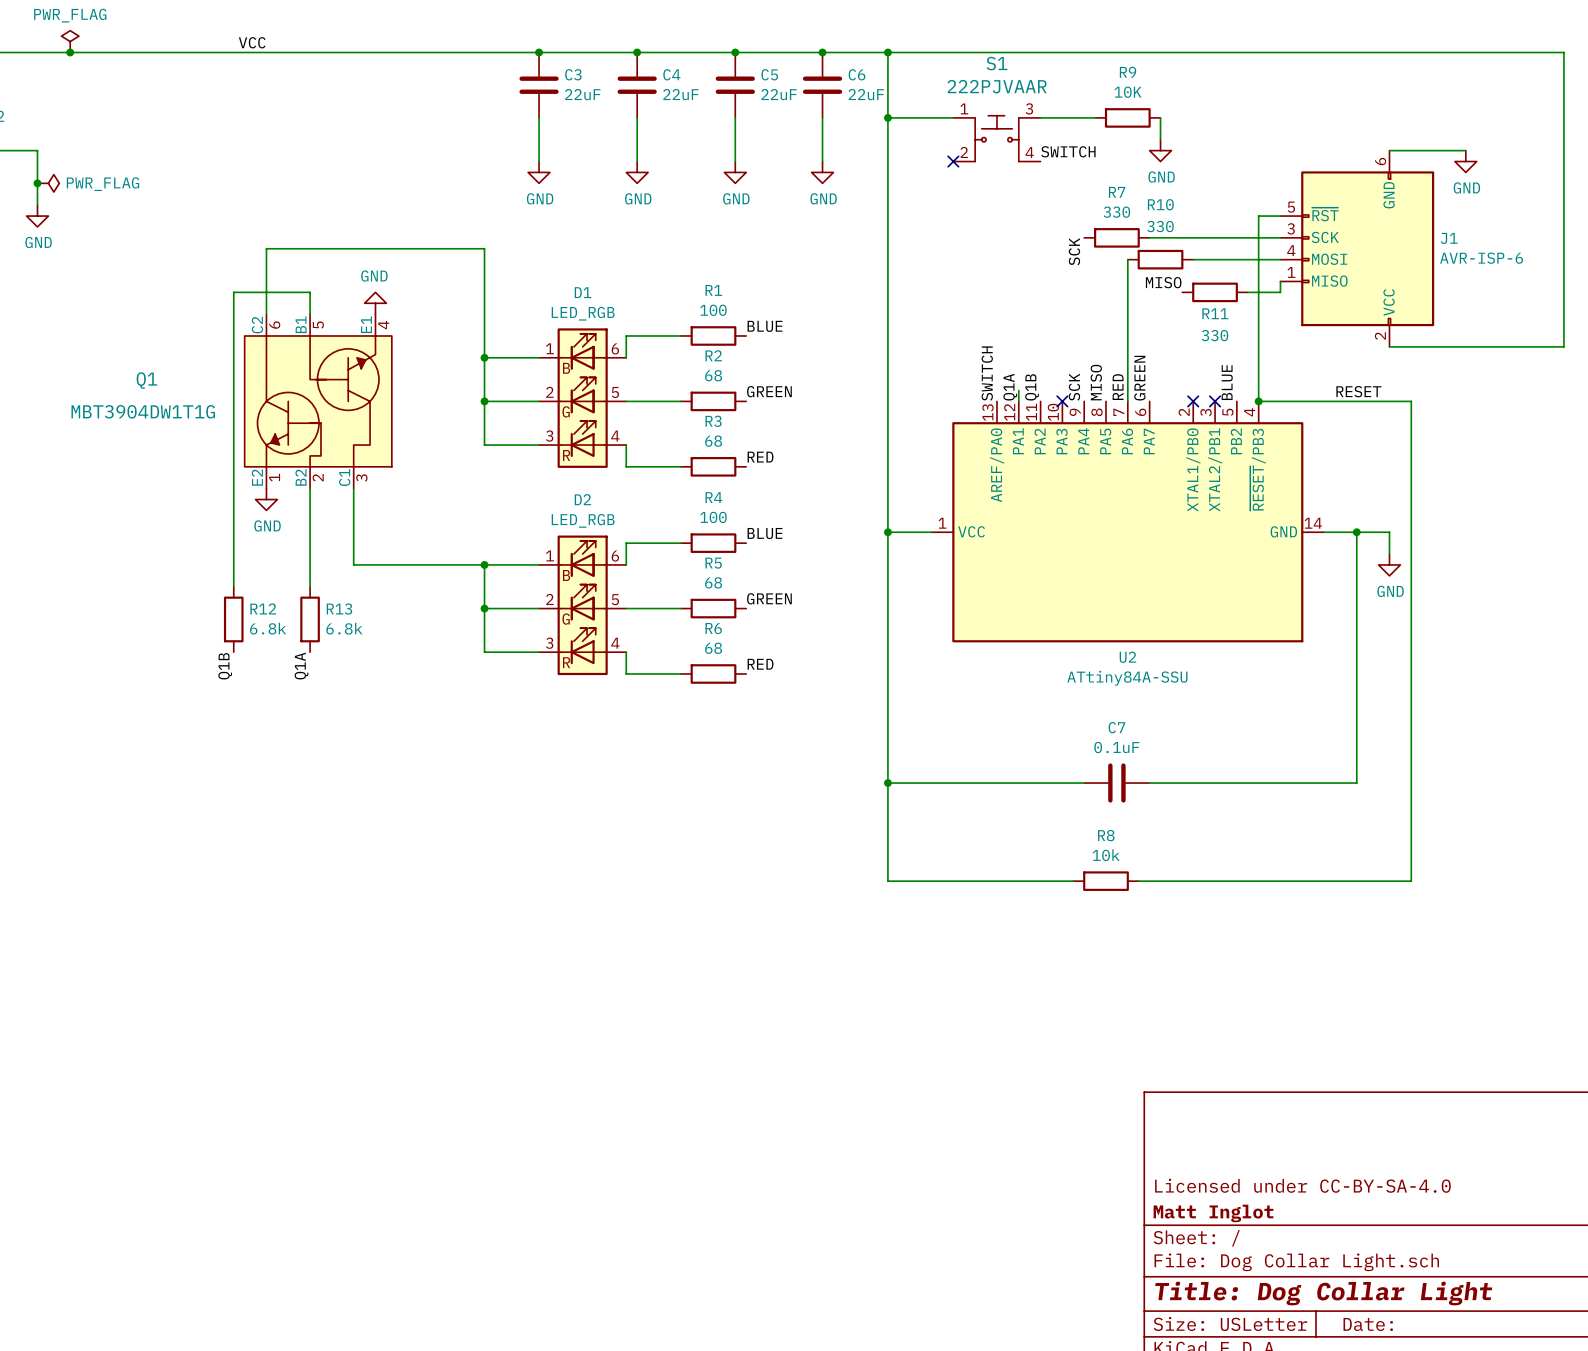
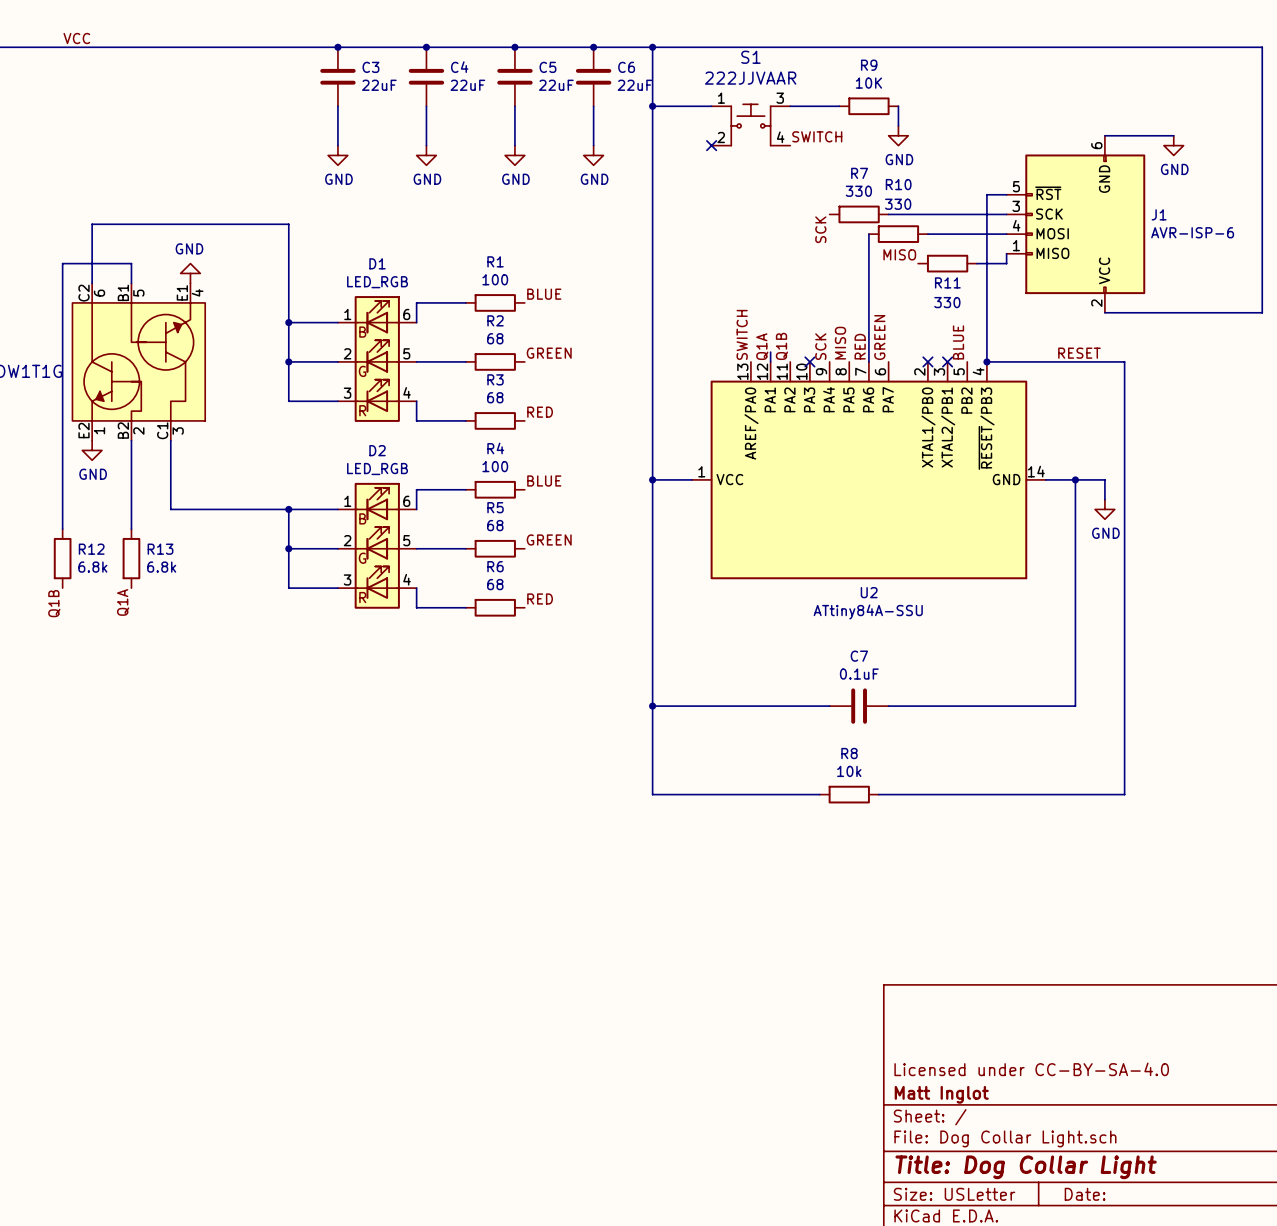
S1 value: 222PJVAAR (997, 86) -> 222JJVAAR (750, 78)

